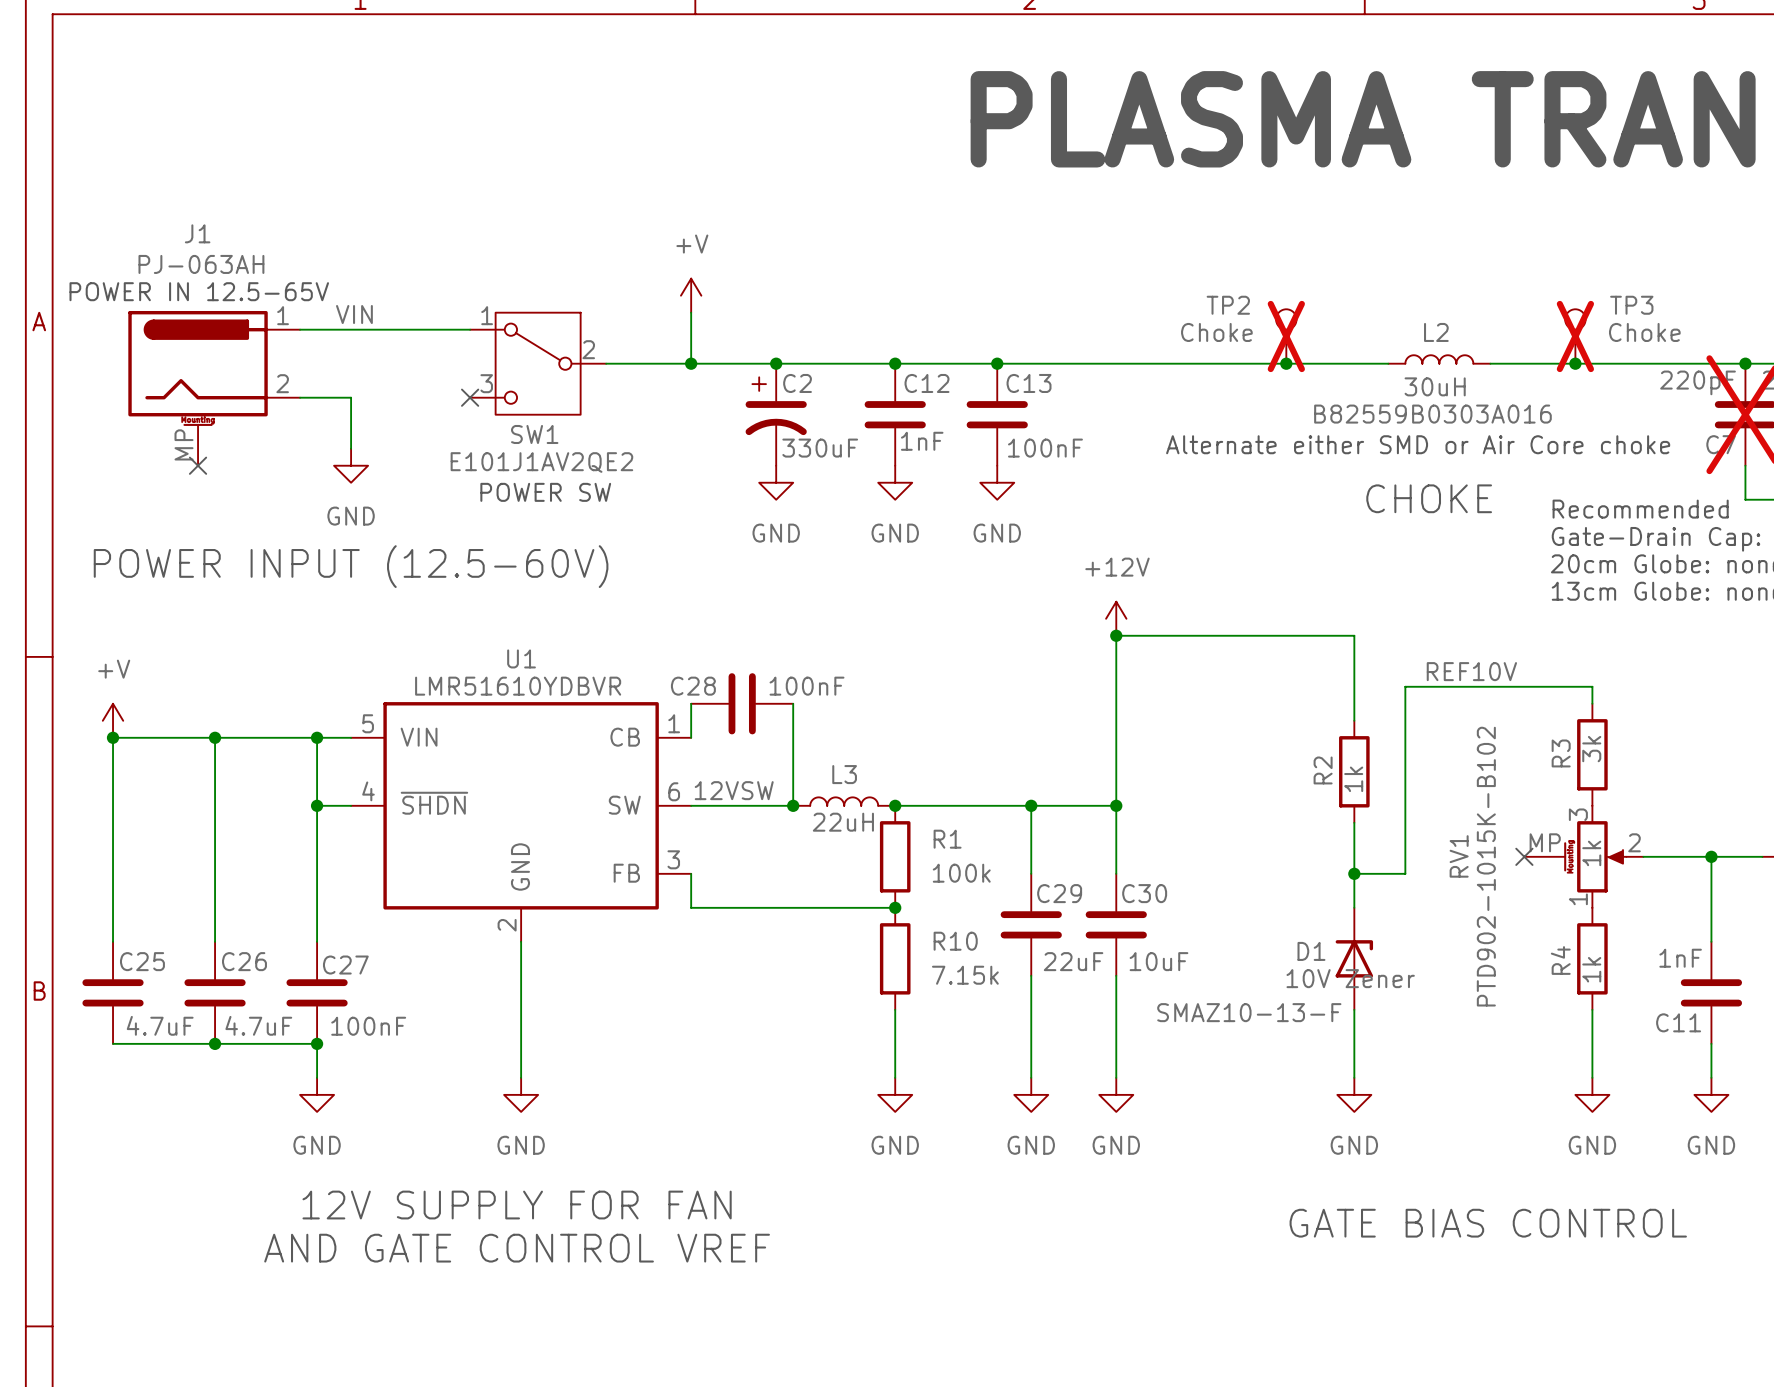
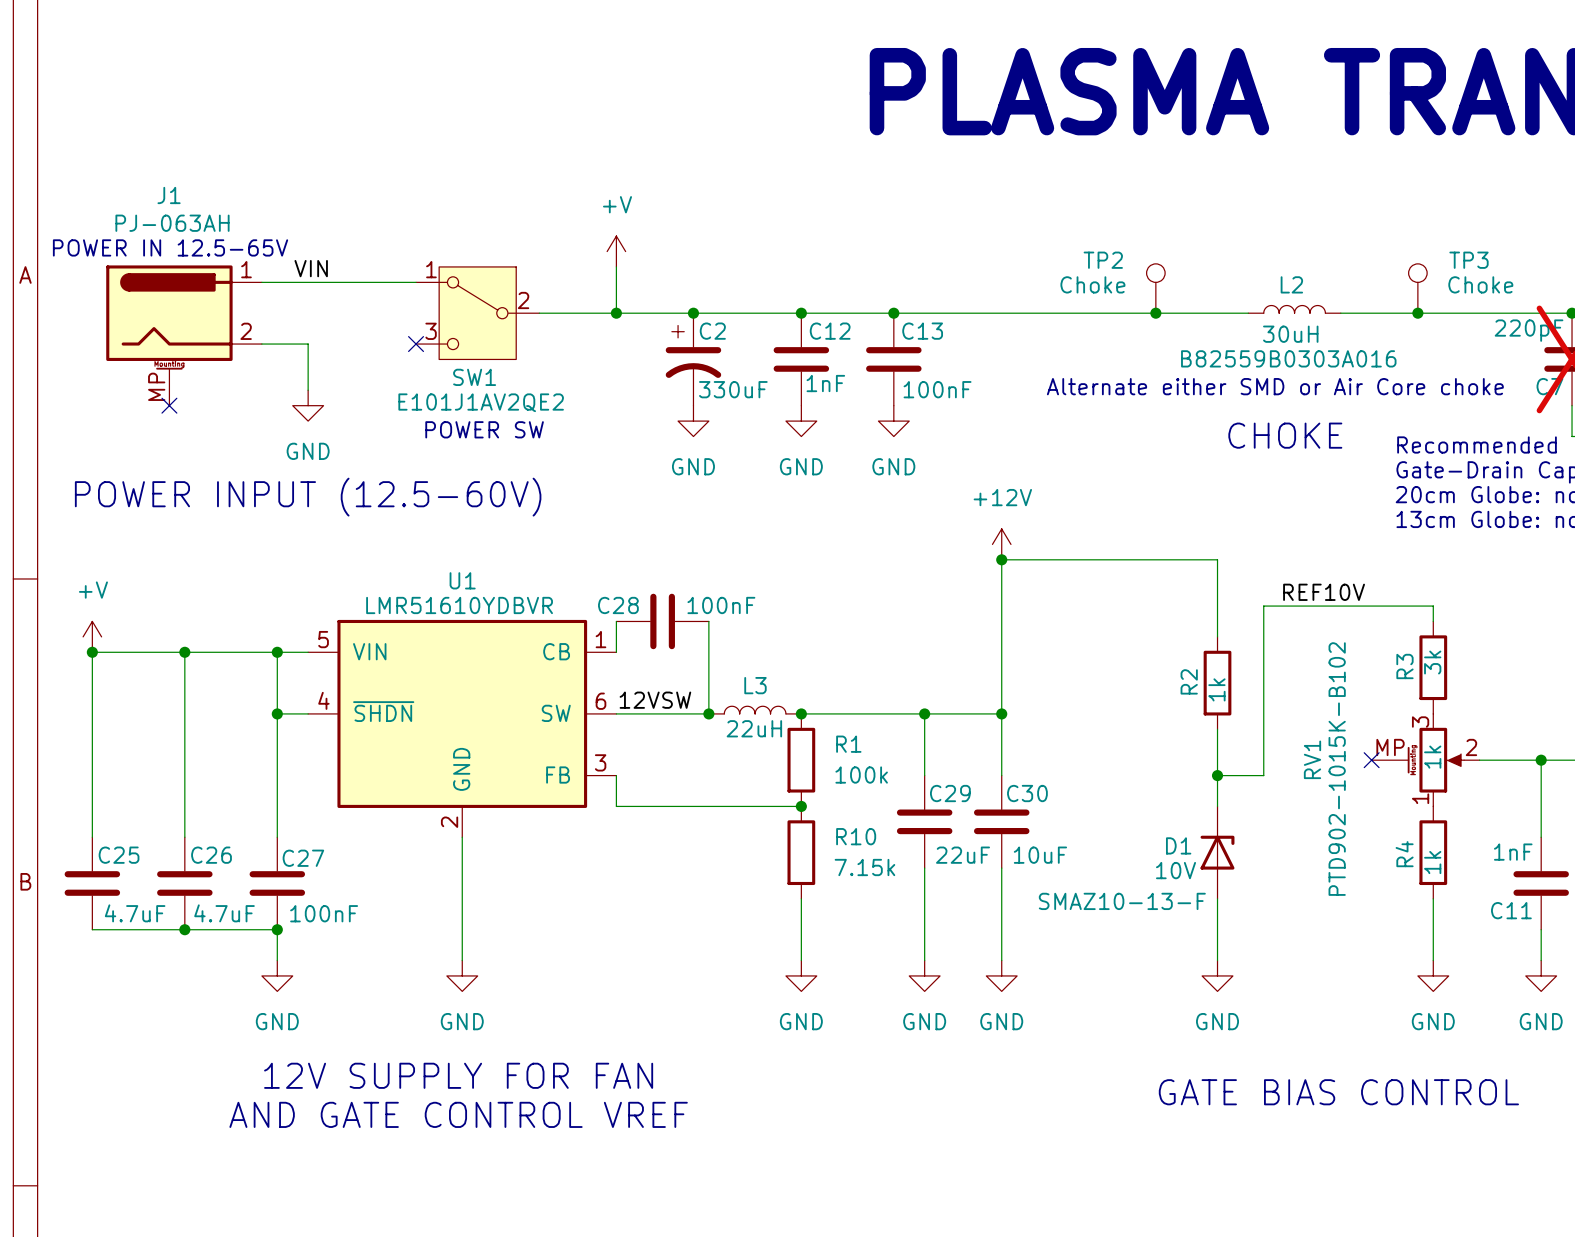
TP2 do-not-place cross: (1286, 336) -> none
TP3 do-not-place cross: (1575, 336) -> none
D1 value: 10V Zener (1350, 978) -> 10V (1176, 870)

